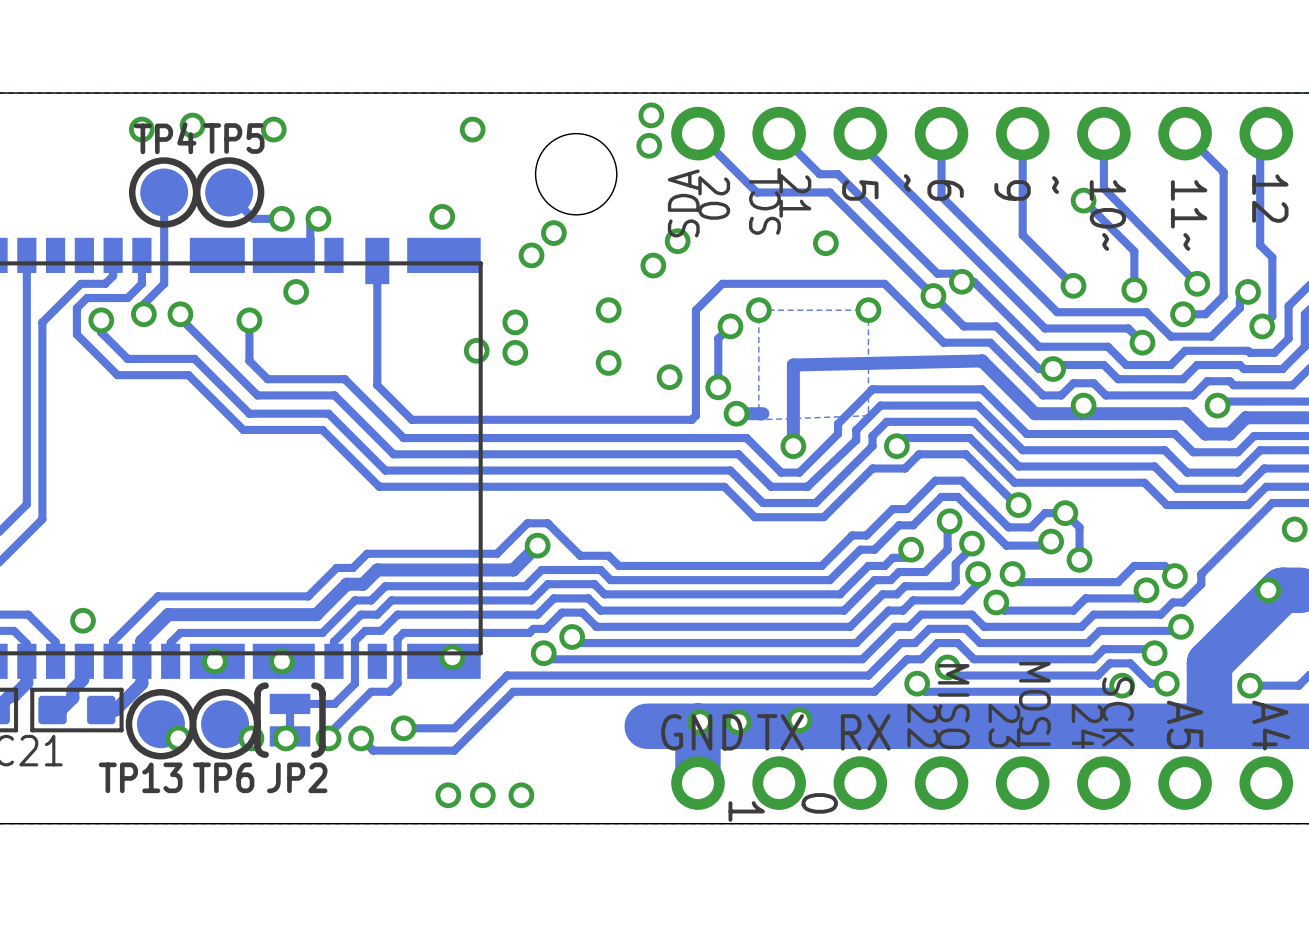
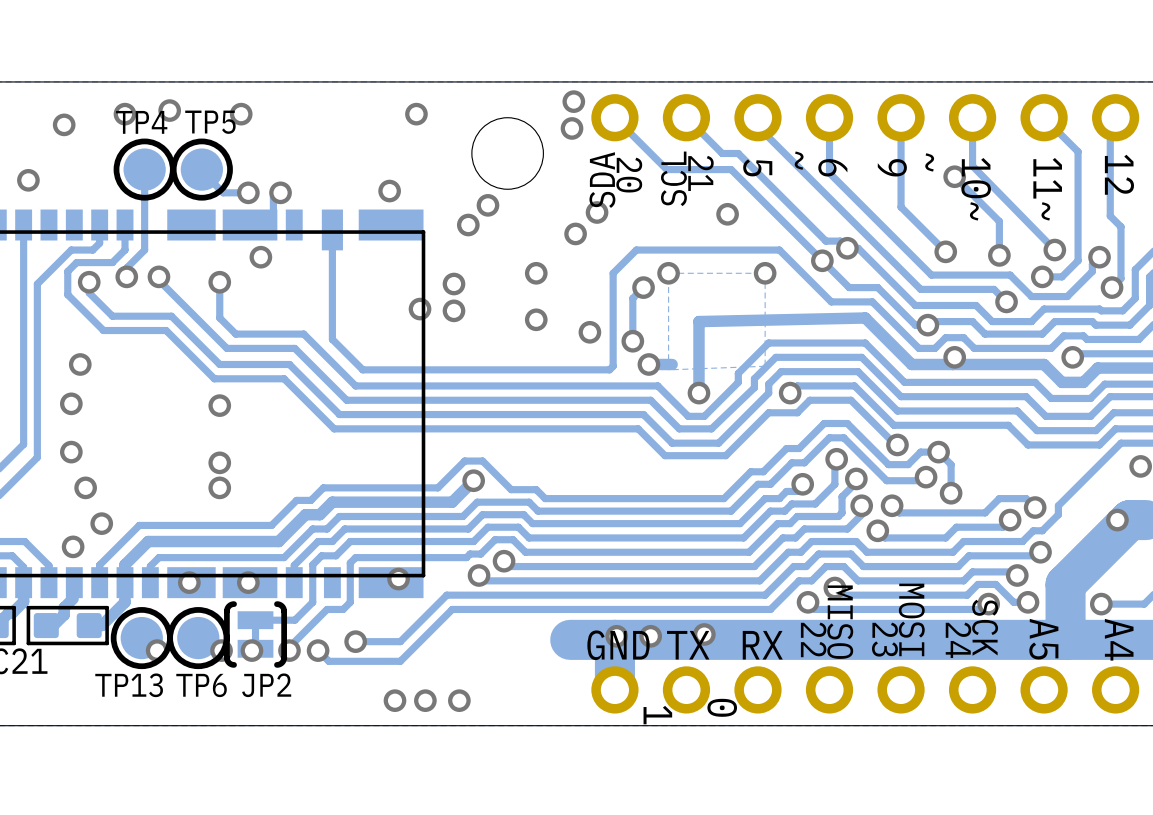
via: none -> (64, 124)
via: none -> (28, 180)
via: none -> (80, 364)
via: none -> (71, 403)
via: none -> (219, 405)
via: none -> (71, 452)
via: none -> (219, 462)
via: none -> (85, 487)
via: none -> (219, 487)
via: none -> (101, 523)

